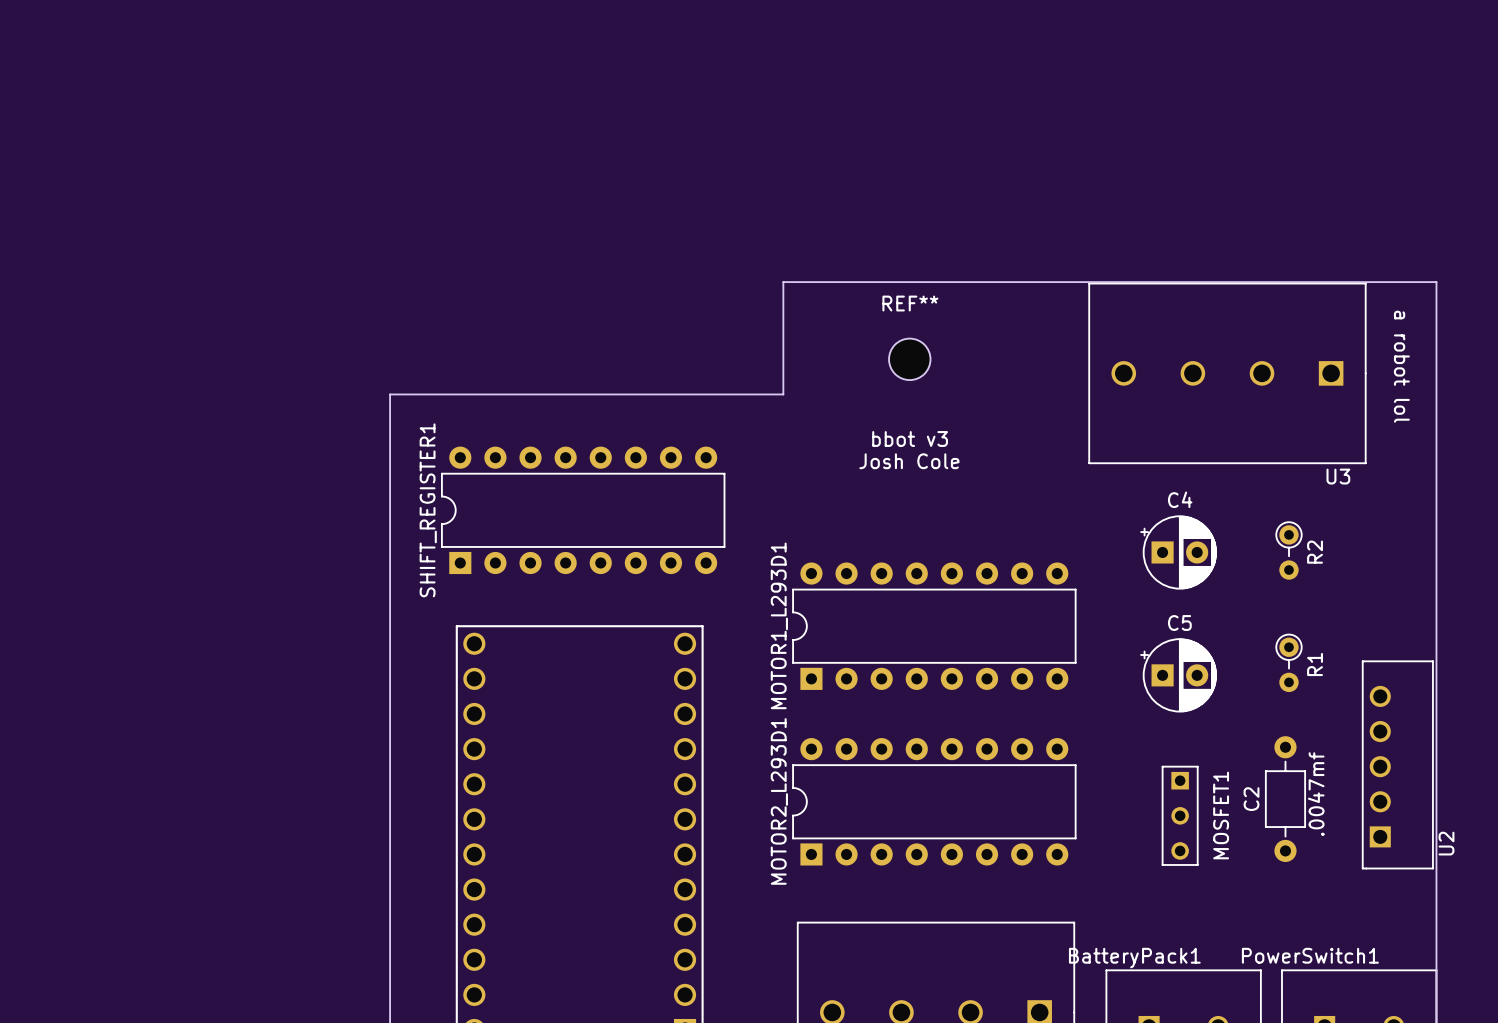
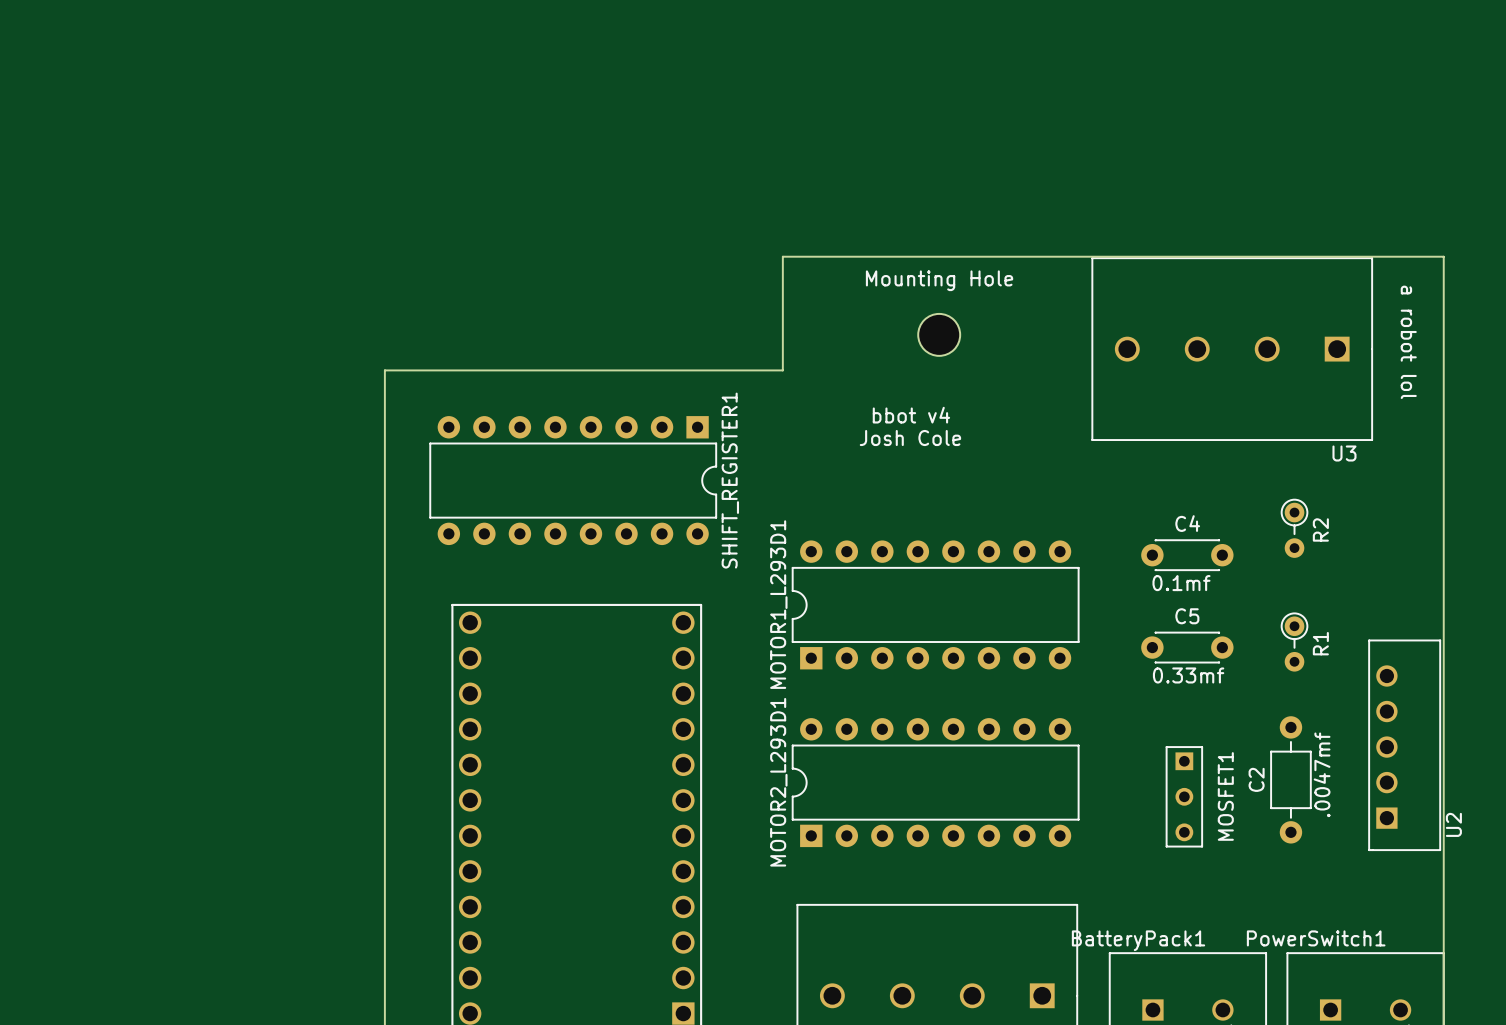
REF**: (909, 359) -> none
Mounting Hole: none -> (939, 334)
text: bbot v3 (910, 438) -> bbot v4 (911, 415)
SHIFT_REGISTER1 rotation: 0° (583, 510) -> 180° (573, 480)
C4 footprint: [1140, 515, 1217, 590] -> [1141, 539, 1234, 571]
text: none -> 0.1mf (1181, 583)
C5 footprint: [1140, 638, 1217, 713] -> [1141, 631, 1234, 664]
text: none -> 0.33mf (1188, 675)

